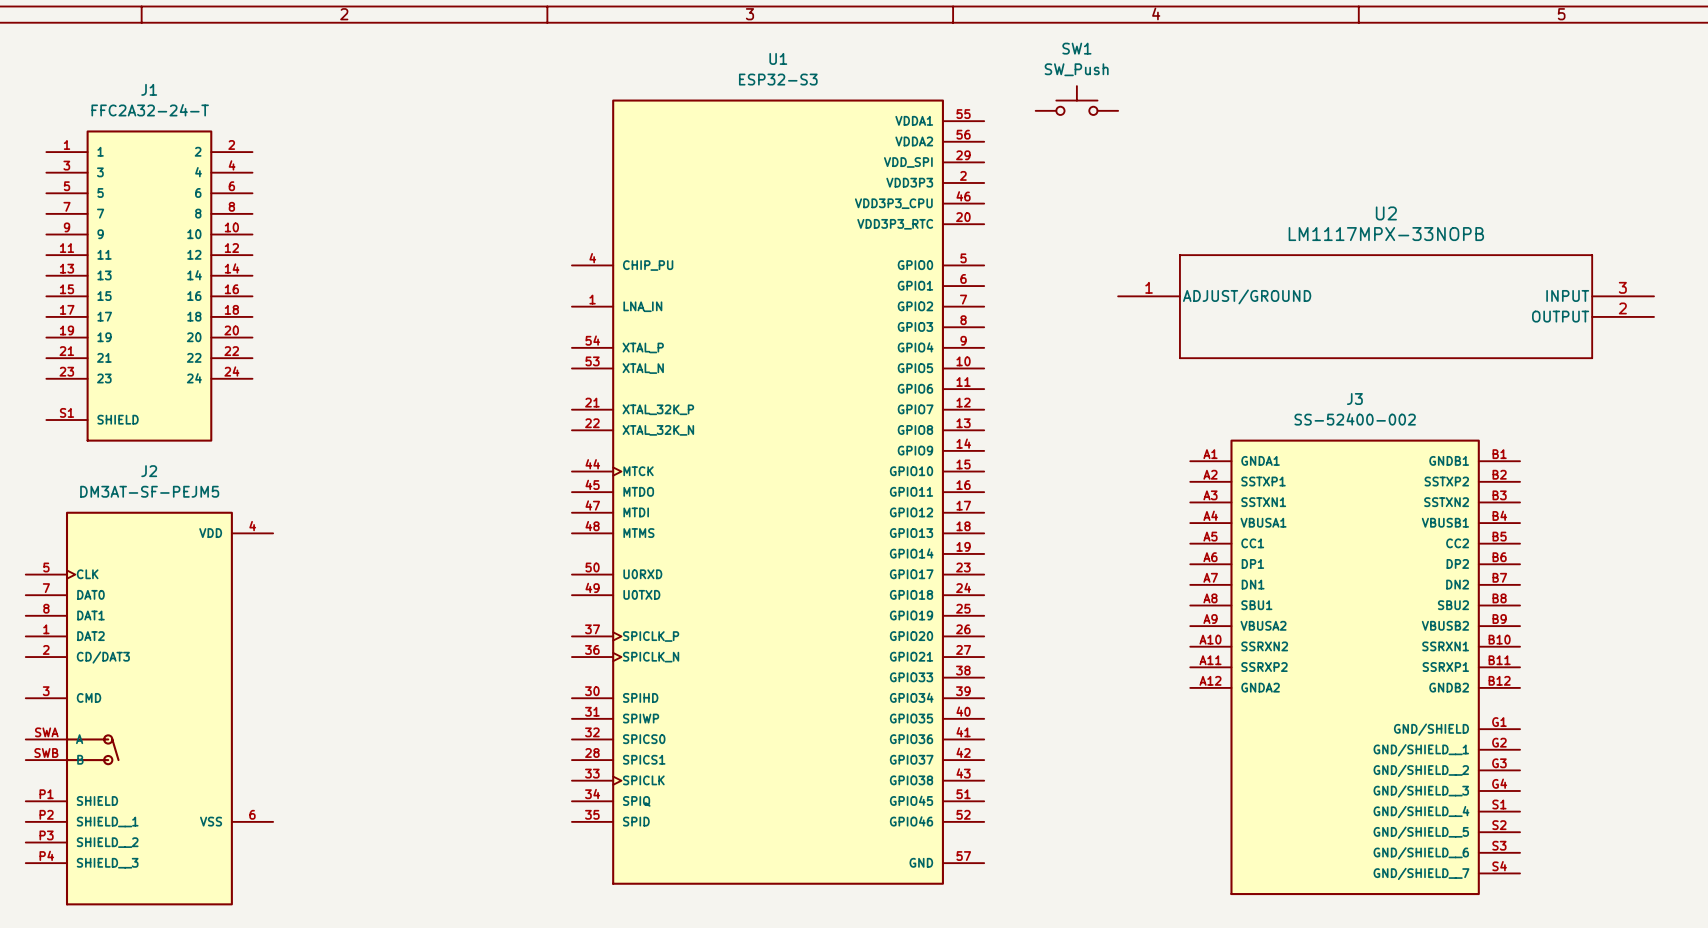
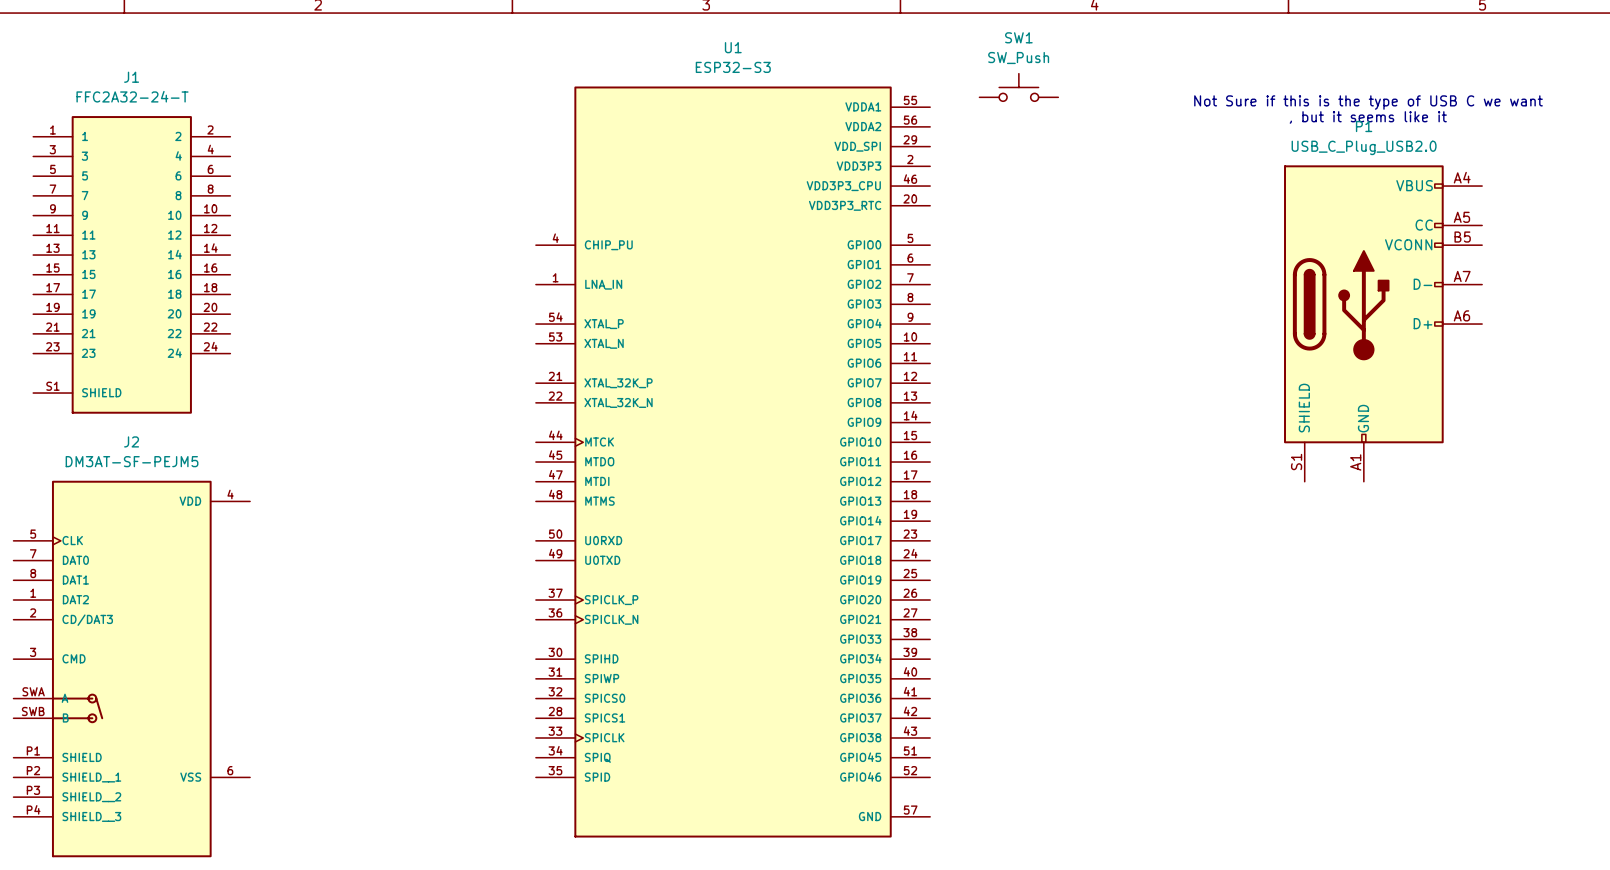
text: none -> Not Sure if this is the type of USB C we want (1368, 102)
text: none -> , but it seems like it (1368, 117)
U2: LM1117MPX-33NOPB (1386, 306) -> none
P1: none -> USB_C_Plug_USB2.0 (1383, 323)
J3: SS-52400-002 (1355, 667) -> none

